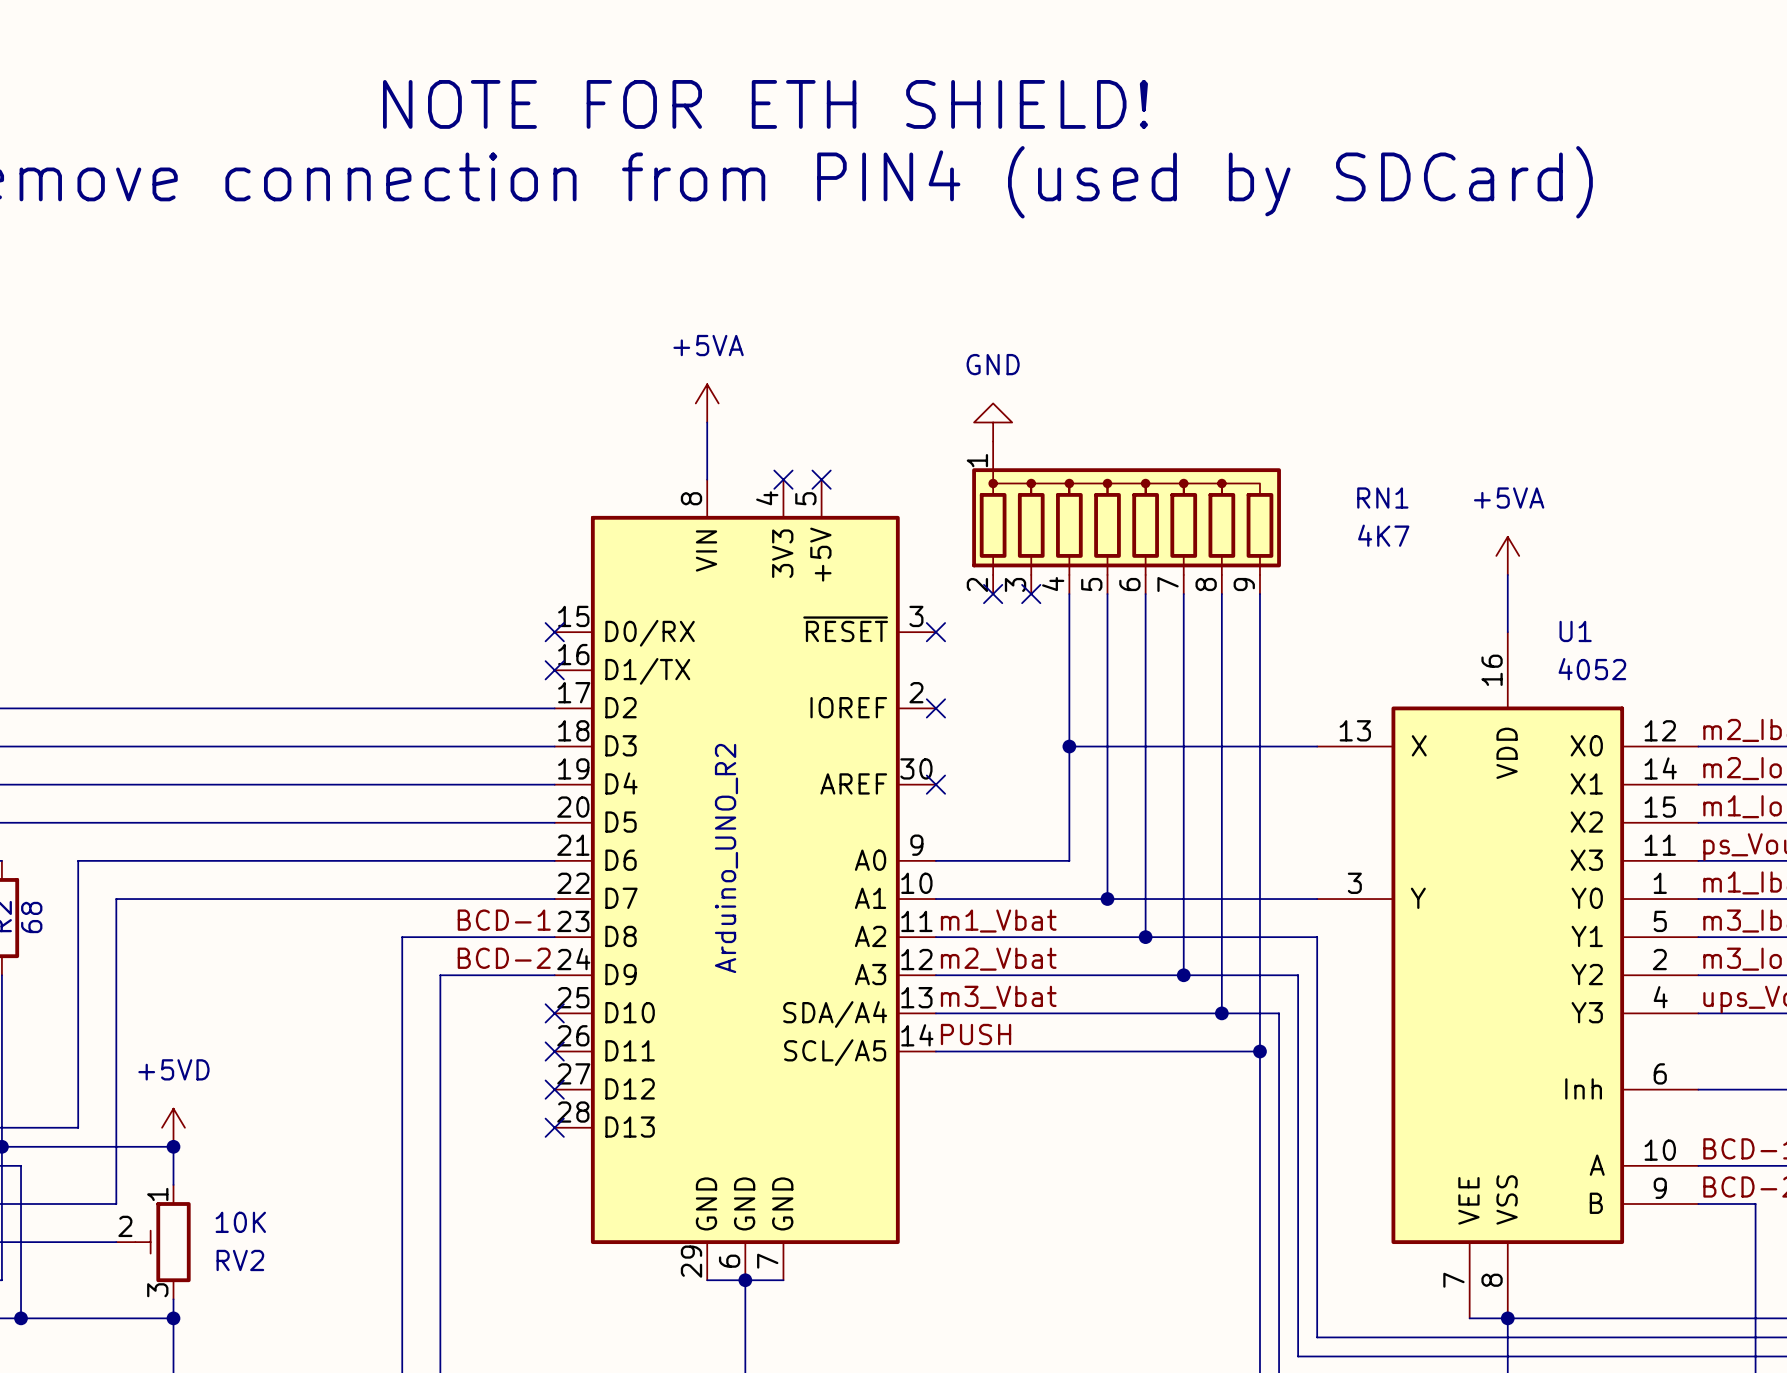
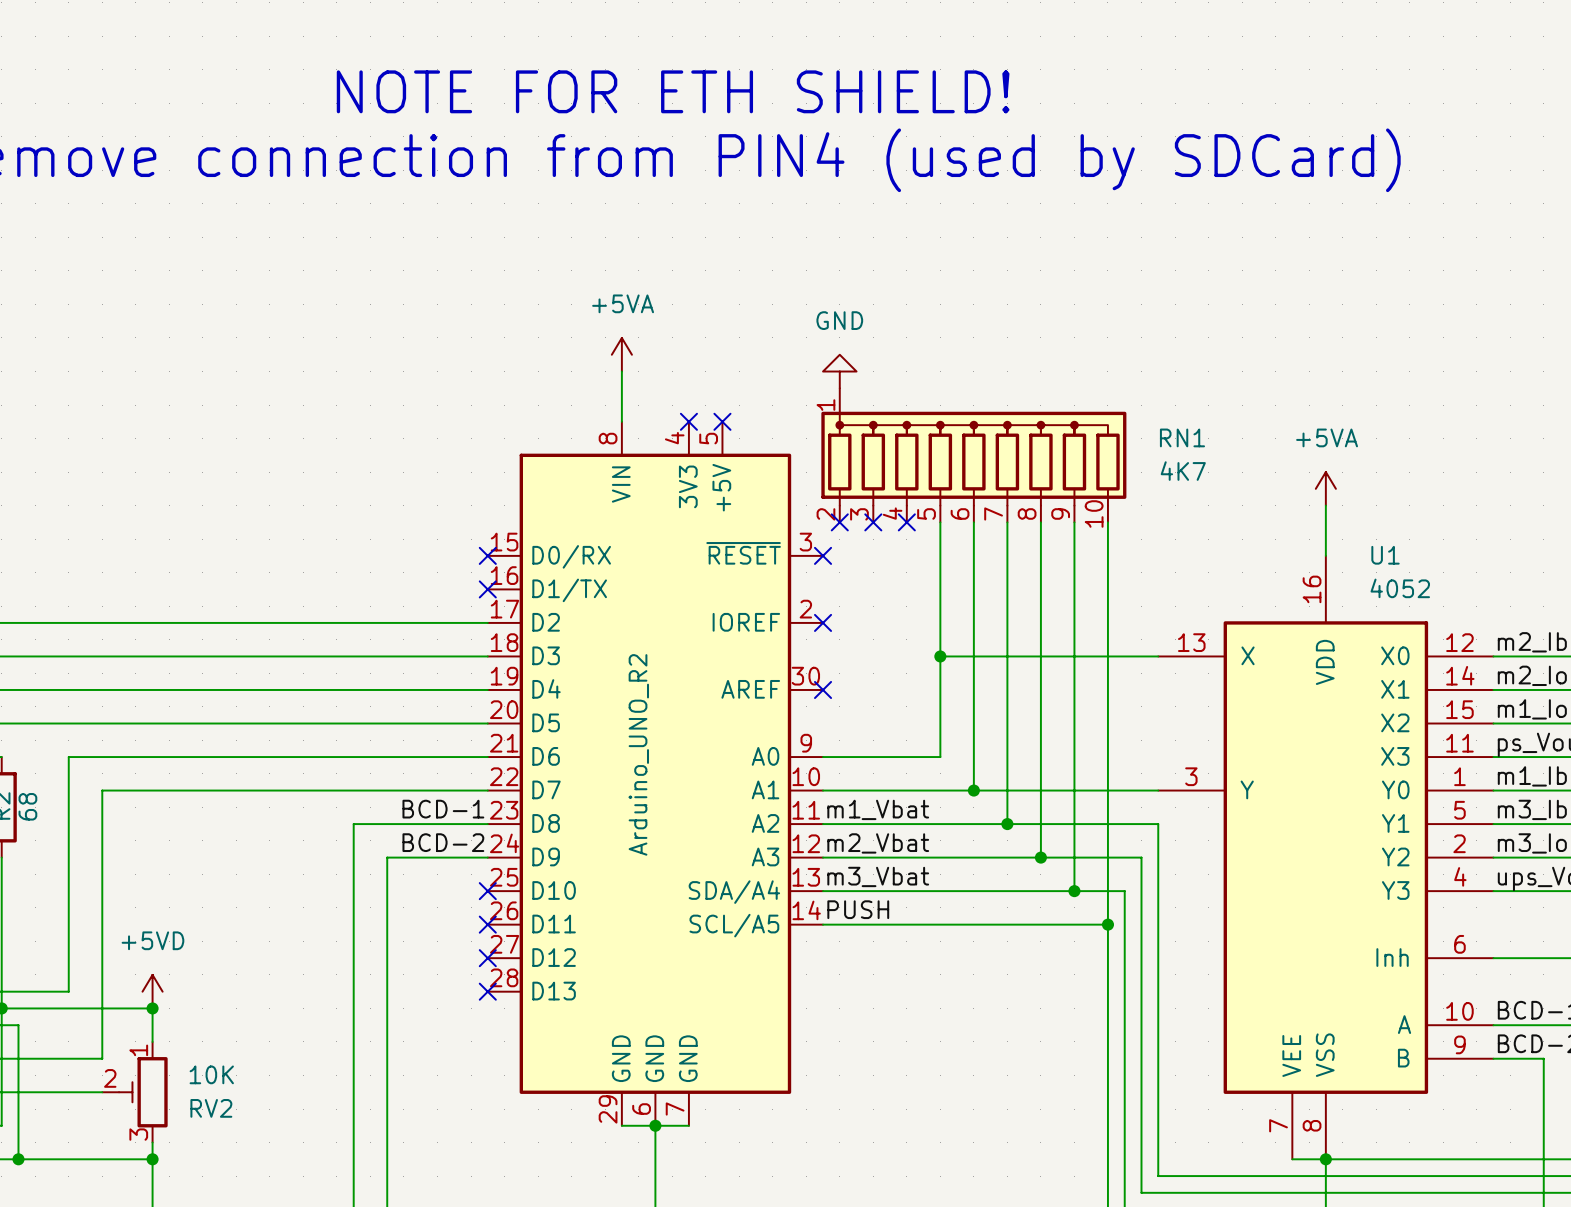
power symbol position: GND (993, 422) -> GND (839, 371)
RN1 symbol: [972, 441, 1281, 595] -> [821, 388, 1127, 523]
no-connect mark: none -> (839, 522)

